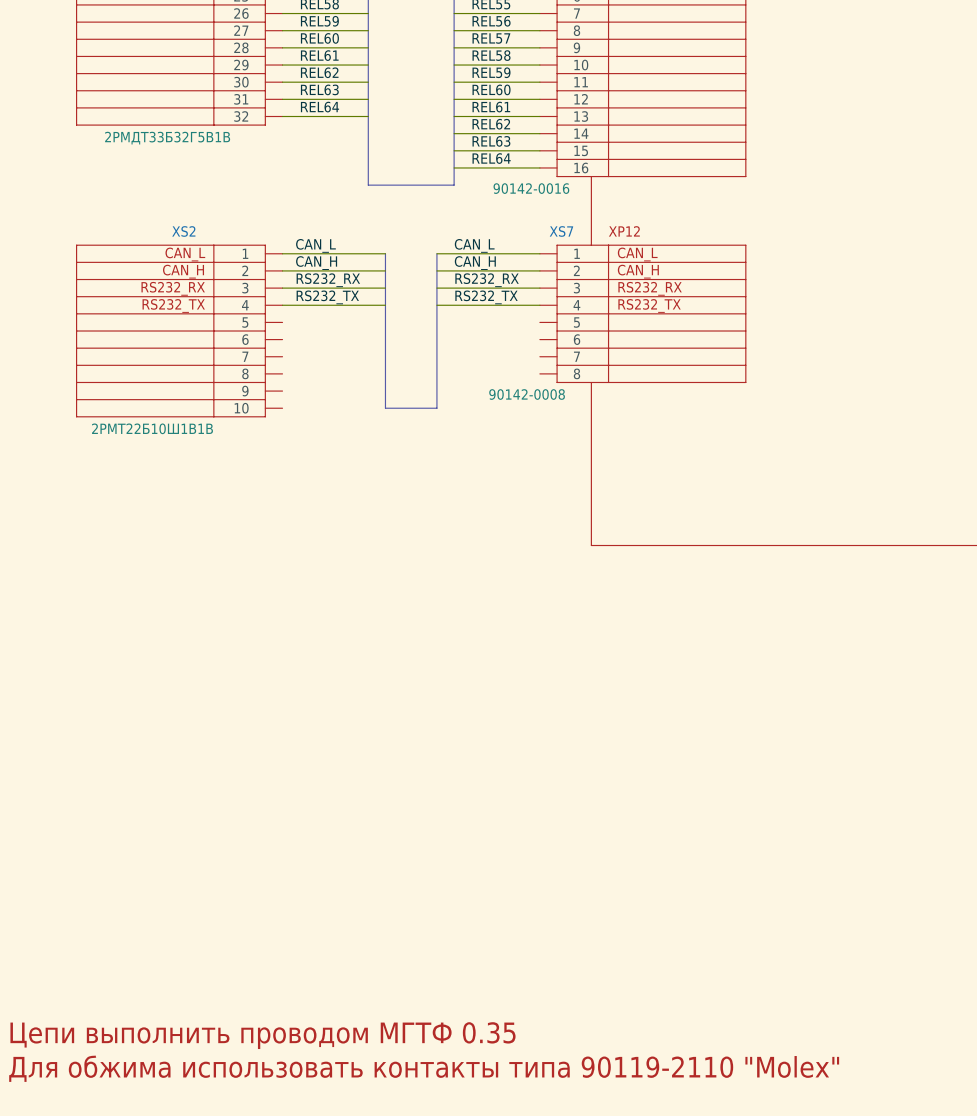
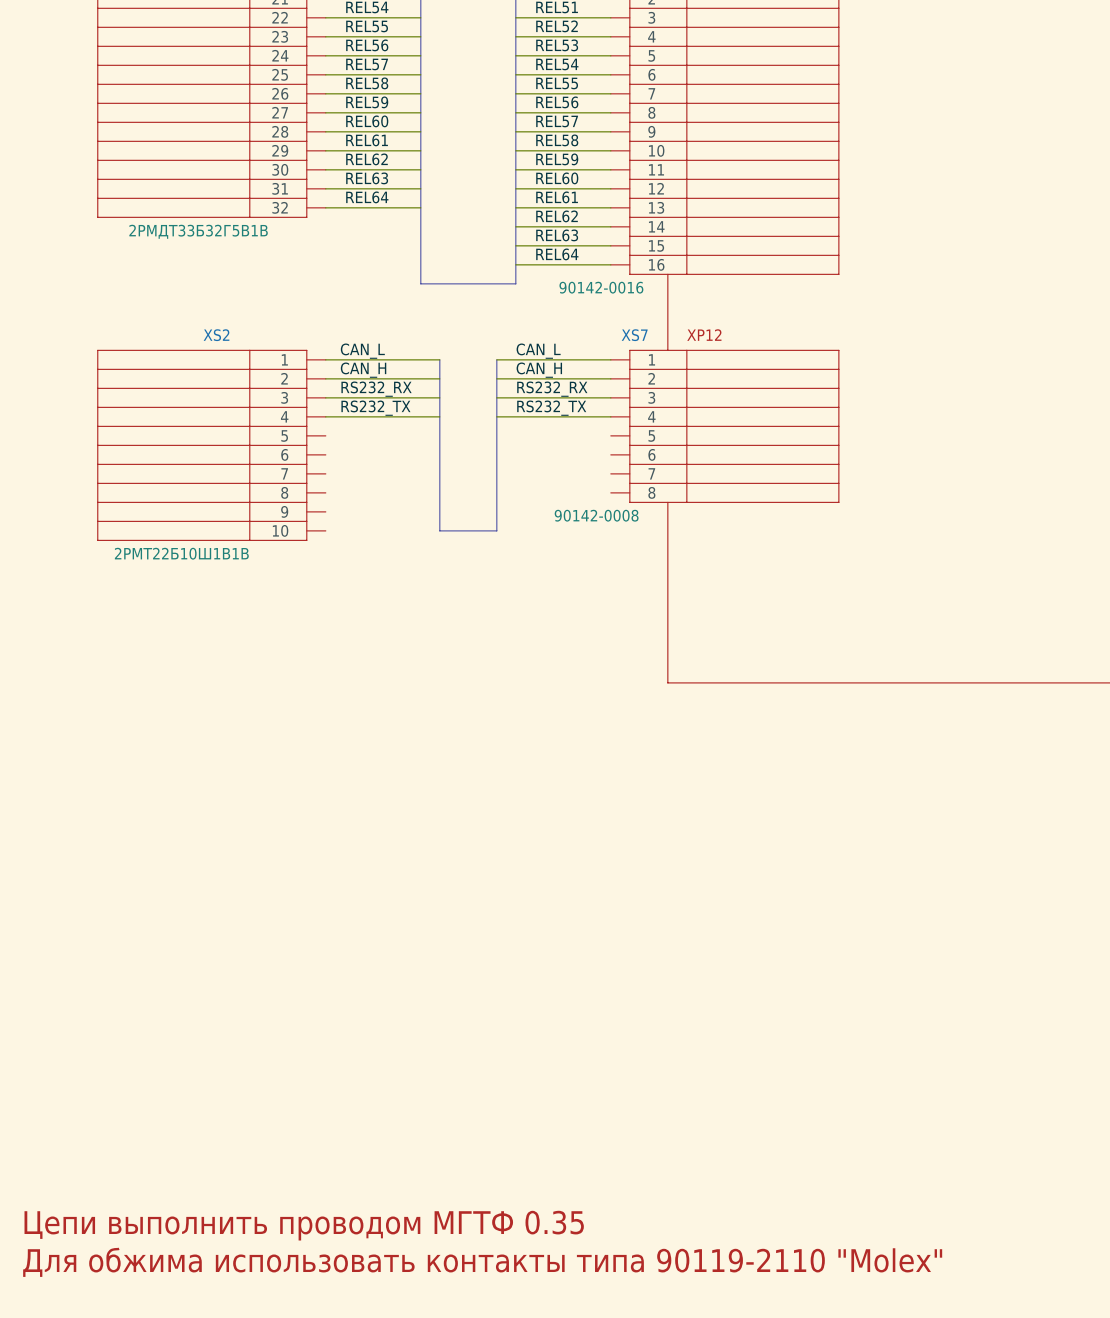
text: CAN_L (185, 254) -> none
text: CAN_L (637, 254) -> none
text: CAN_H (183, 271) -> none
text: CAN_H (638, 271) -> none
text: RS232_RX (173, 288) -> none
text: RS232_RX (650, 288) -> none
text: RS232_TX (173, 305) -> none
text: RS232_TX (649, 305) -> none

